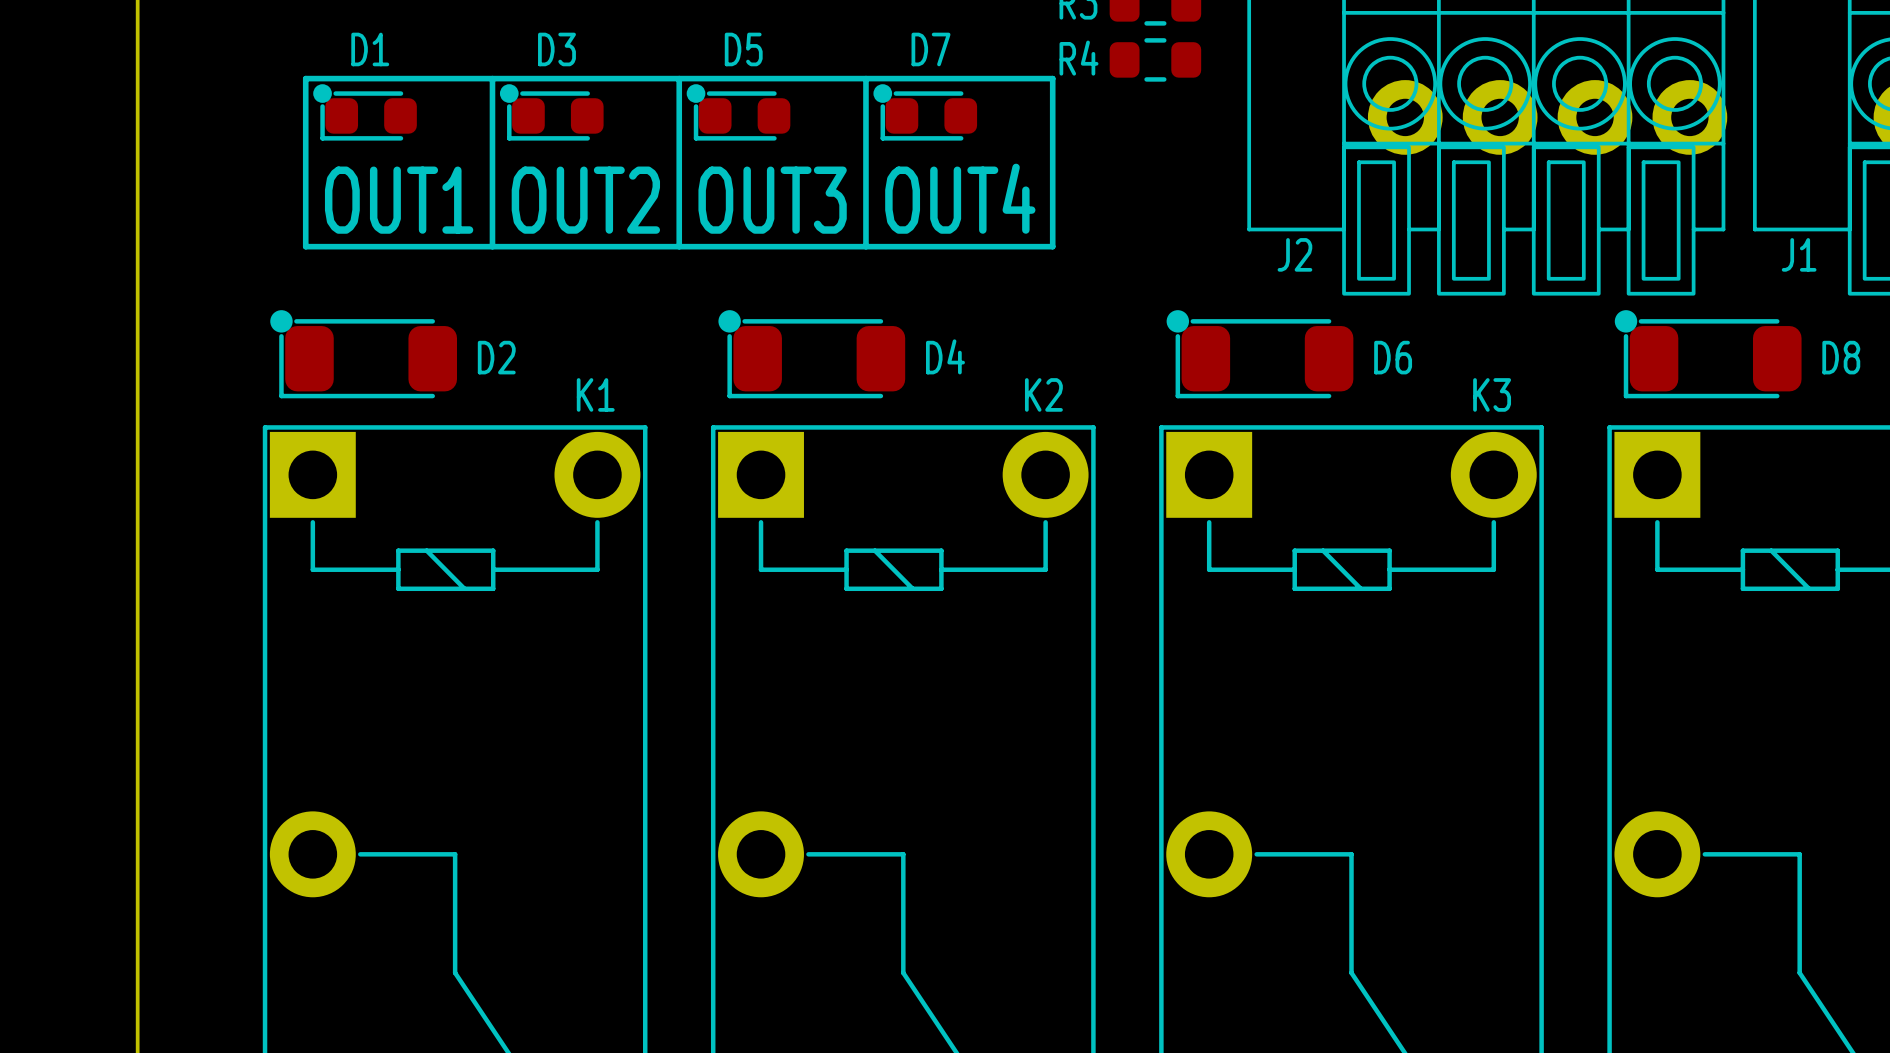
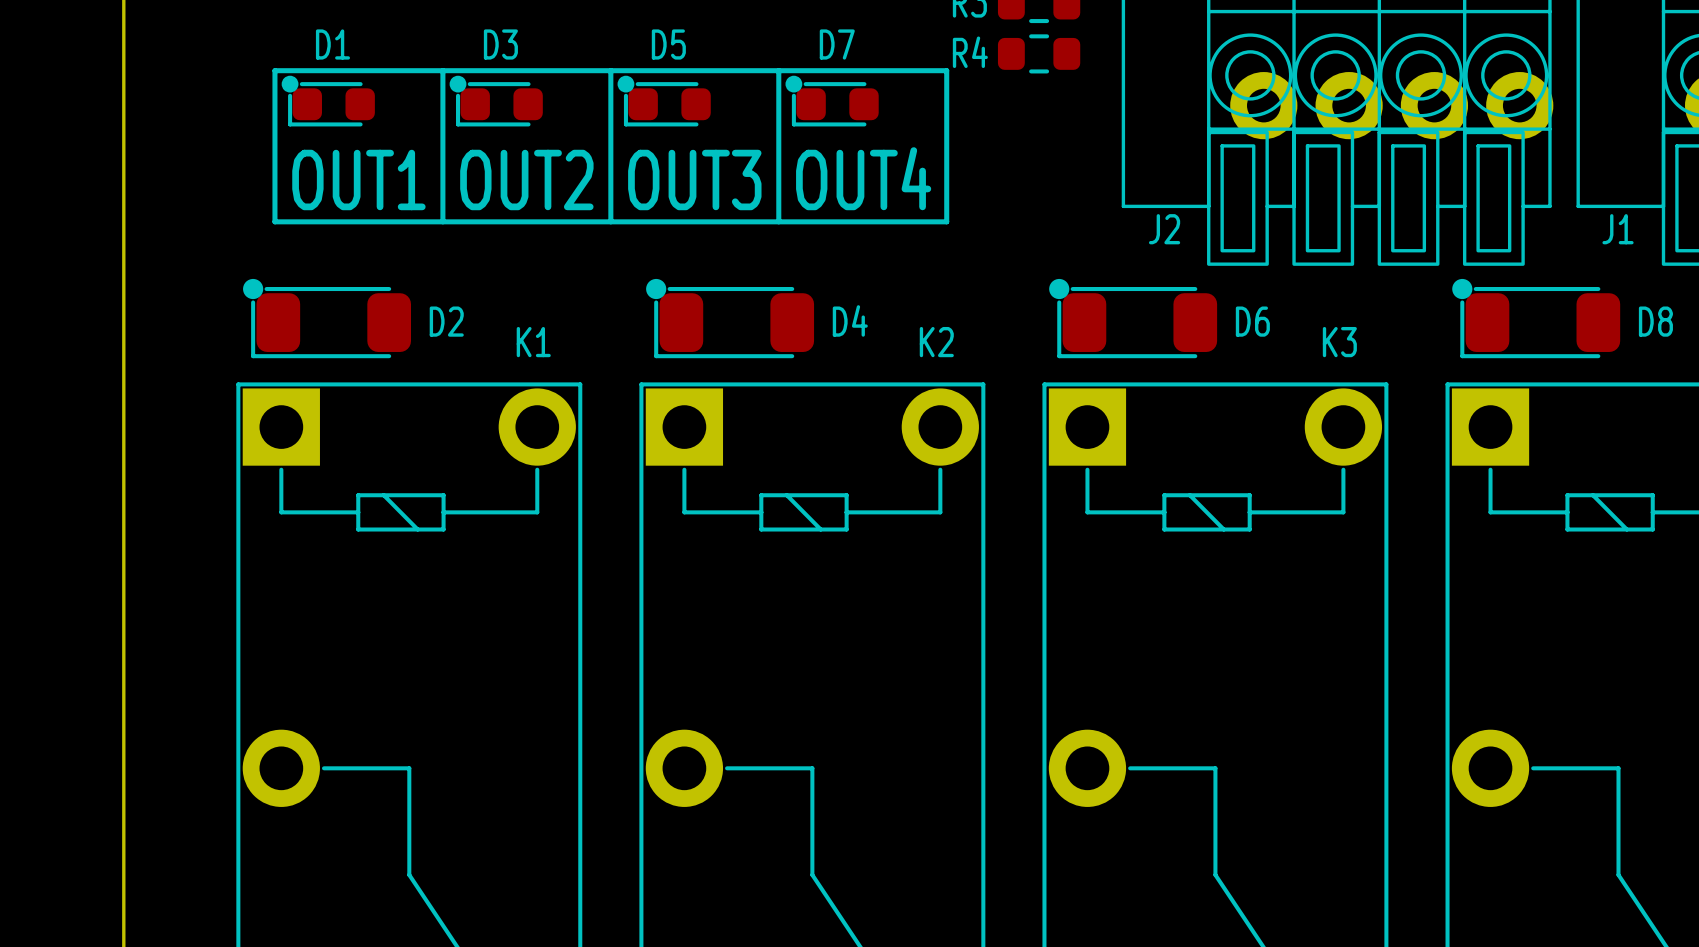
K1 name position: K1 (595, 394) -> K1 (533, 342)
K2 name position: K2 (1043, 394) -> K2 (936, 342)
K3 name position: K3 (1492, 394) -> K3 (1339, 342)

